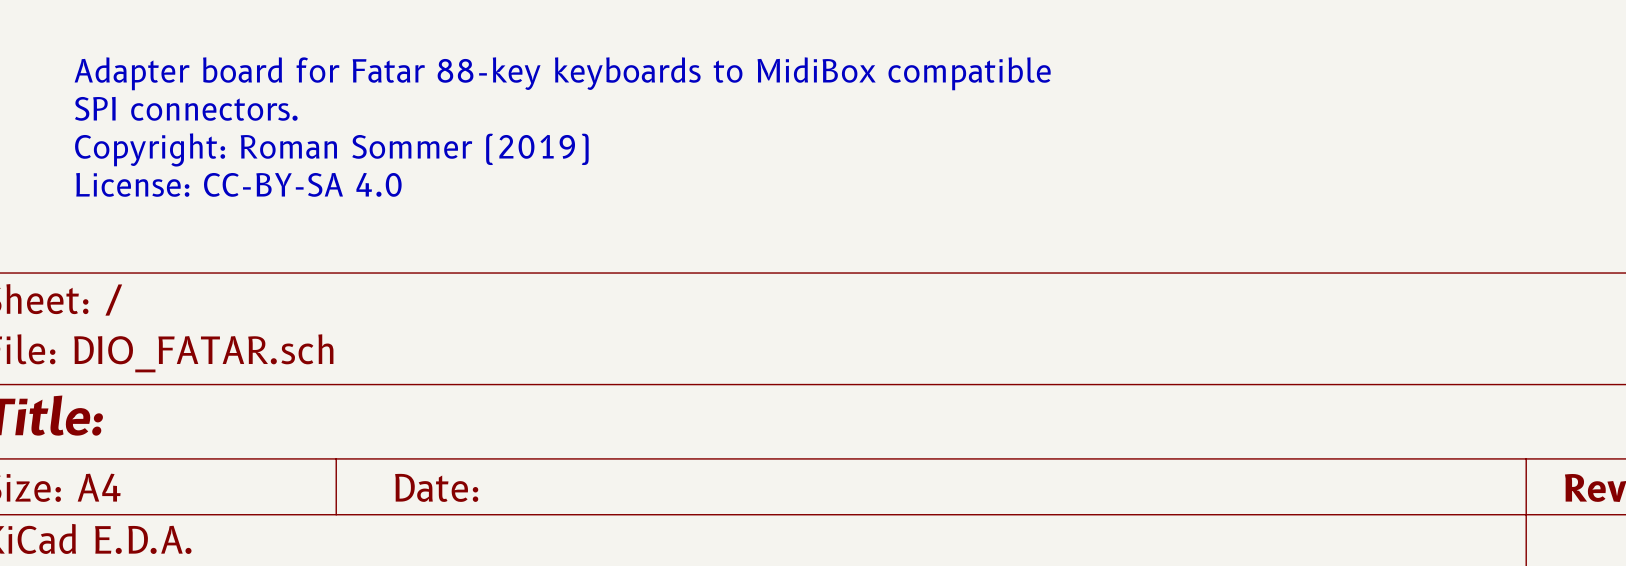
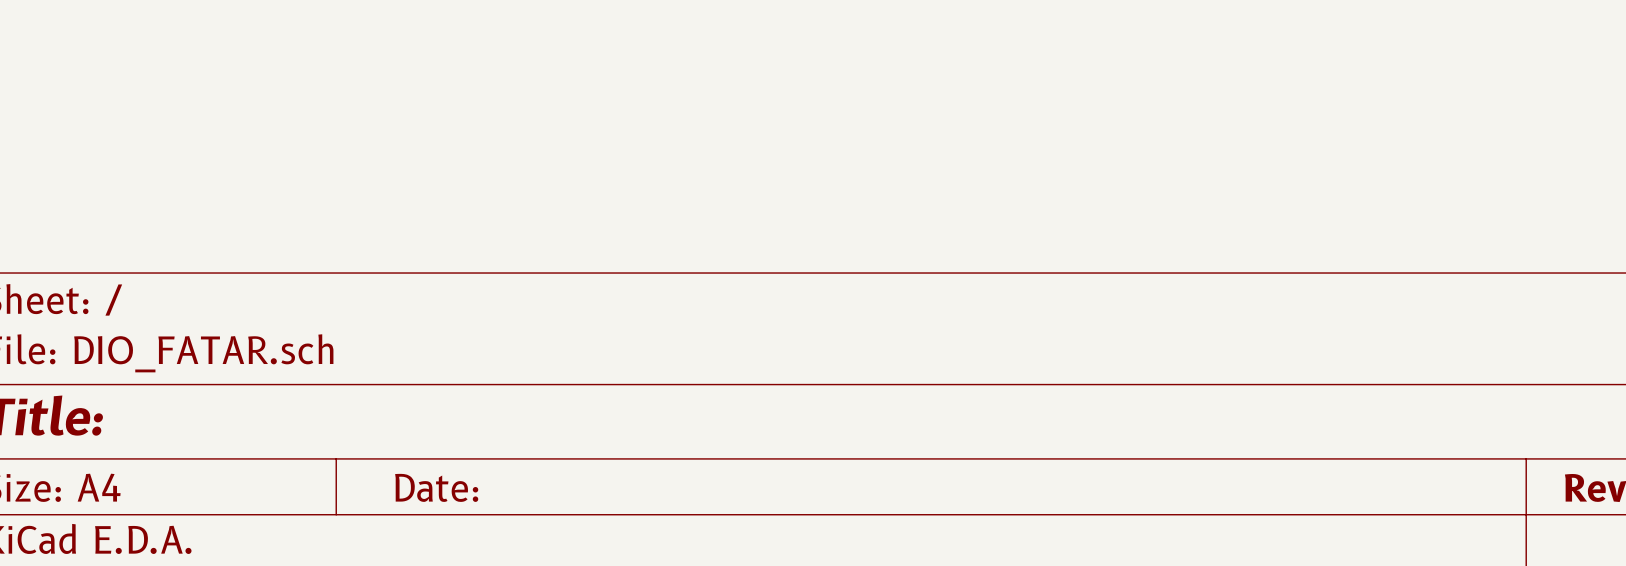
text: Adapter board for Fatar 88-key keyboards to MidiBox compatible (562, 73) -> none
text: SPI connectors. (186, 108) -> none
text: Copyright: Roman Sommer (2019) (331, 149) -> none
text: License: CC-BY-SA 4.0 (238, 184) -> none

